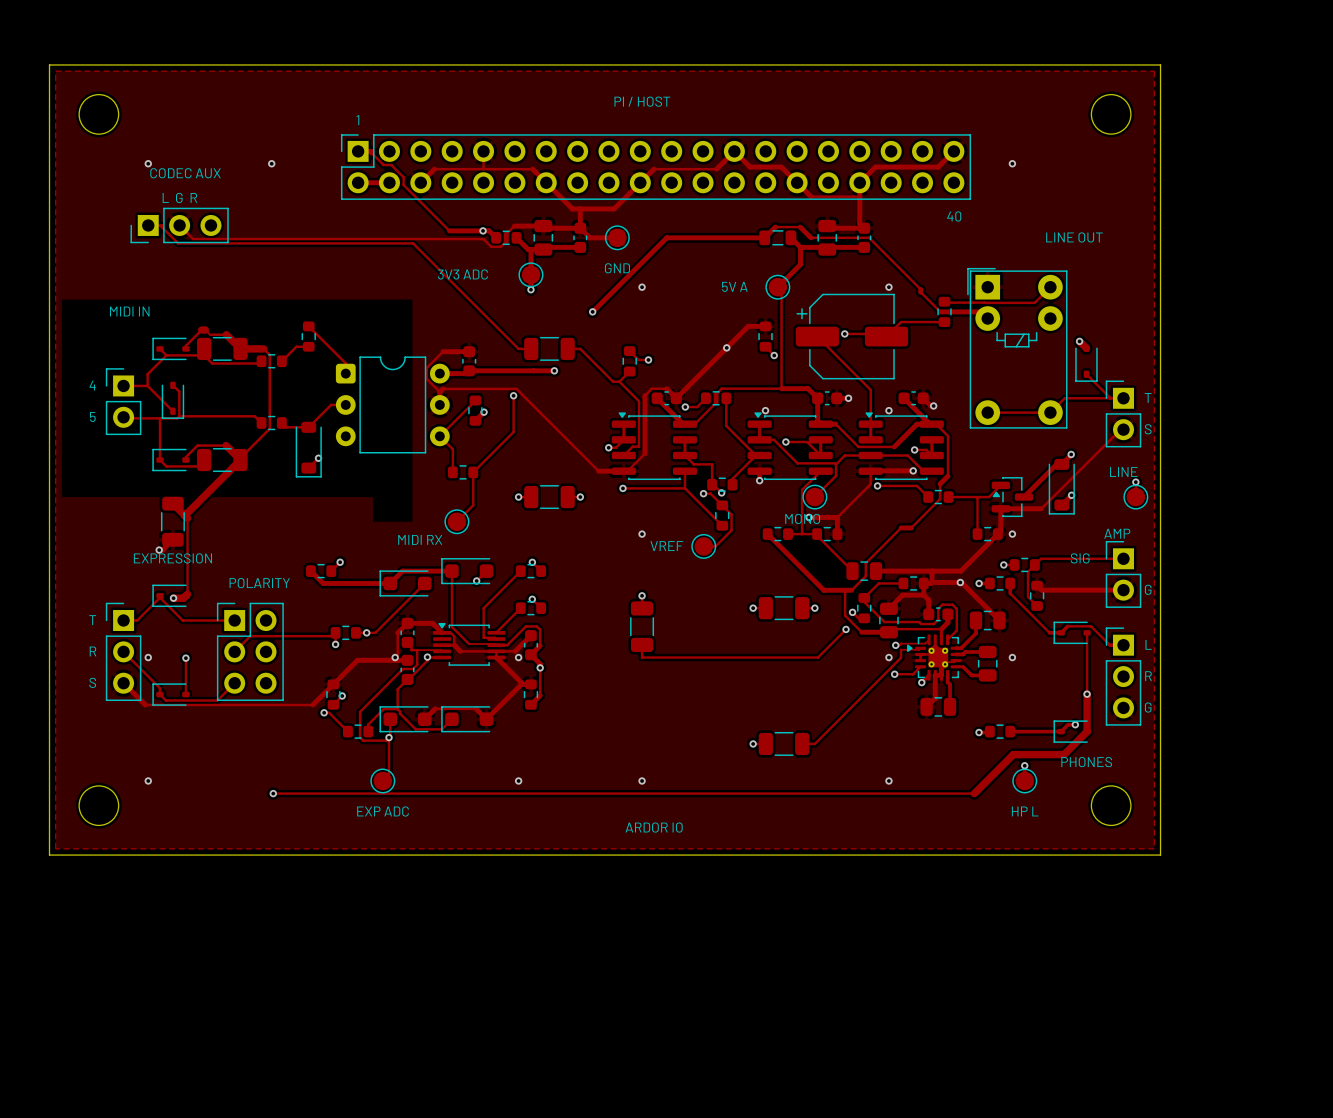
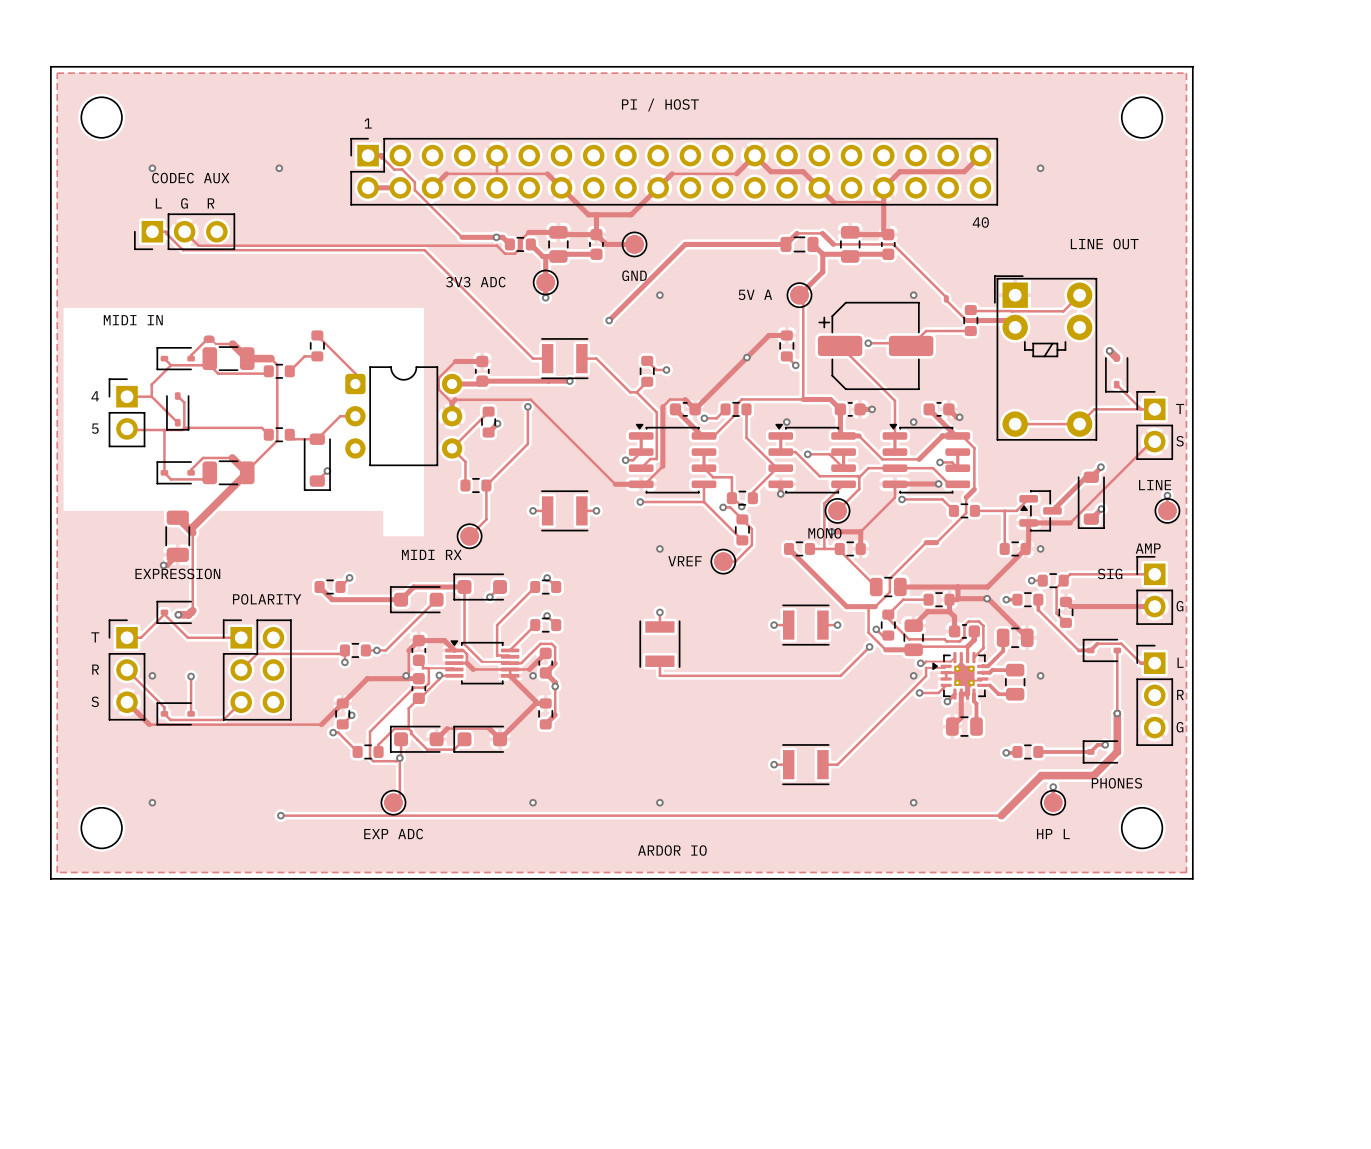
part footprint: [524, 336, 575, 361] -> [541, 338, 589, 380]
part footprint: [524, 485, 575, 510] -> [541, 490, 589, 532]
part footprint: [758, 596, 810, 621] -> [782, 604, 830, 646]
part footprint: [630, 601, 655, 652] -> [639, 620, 681, 668]
part footprint: [758, 731, 810, 756] -> [782, 744, 830, 786]

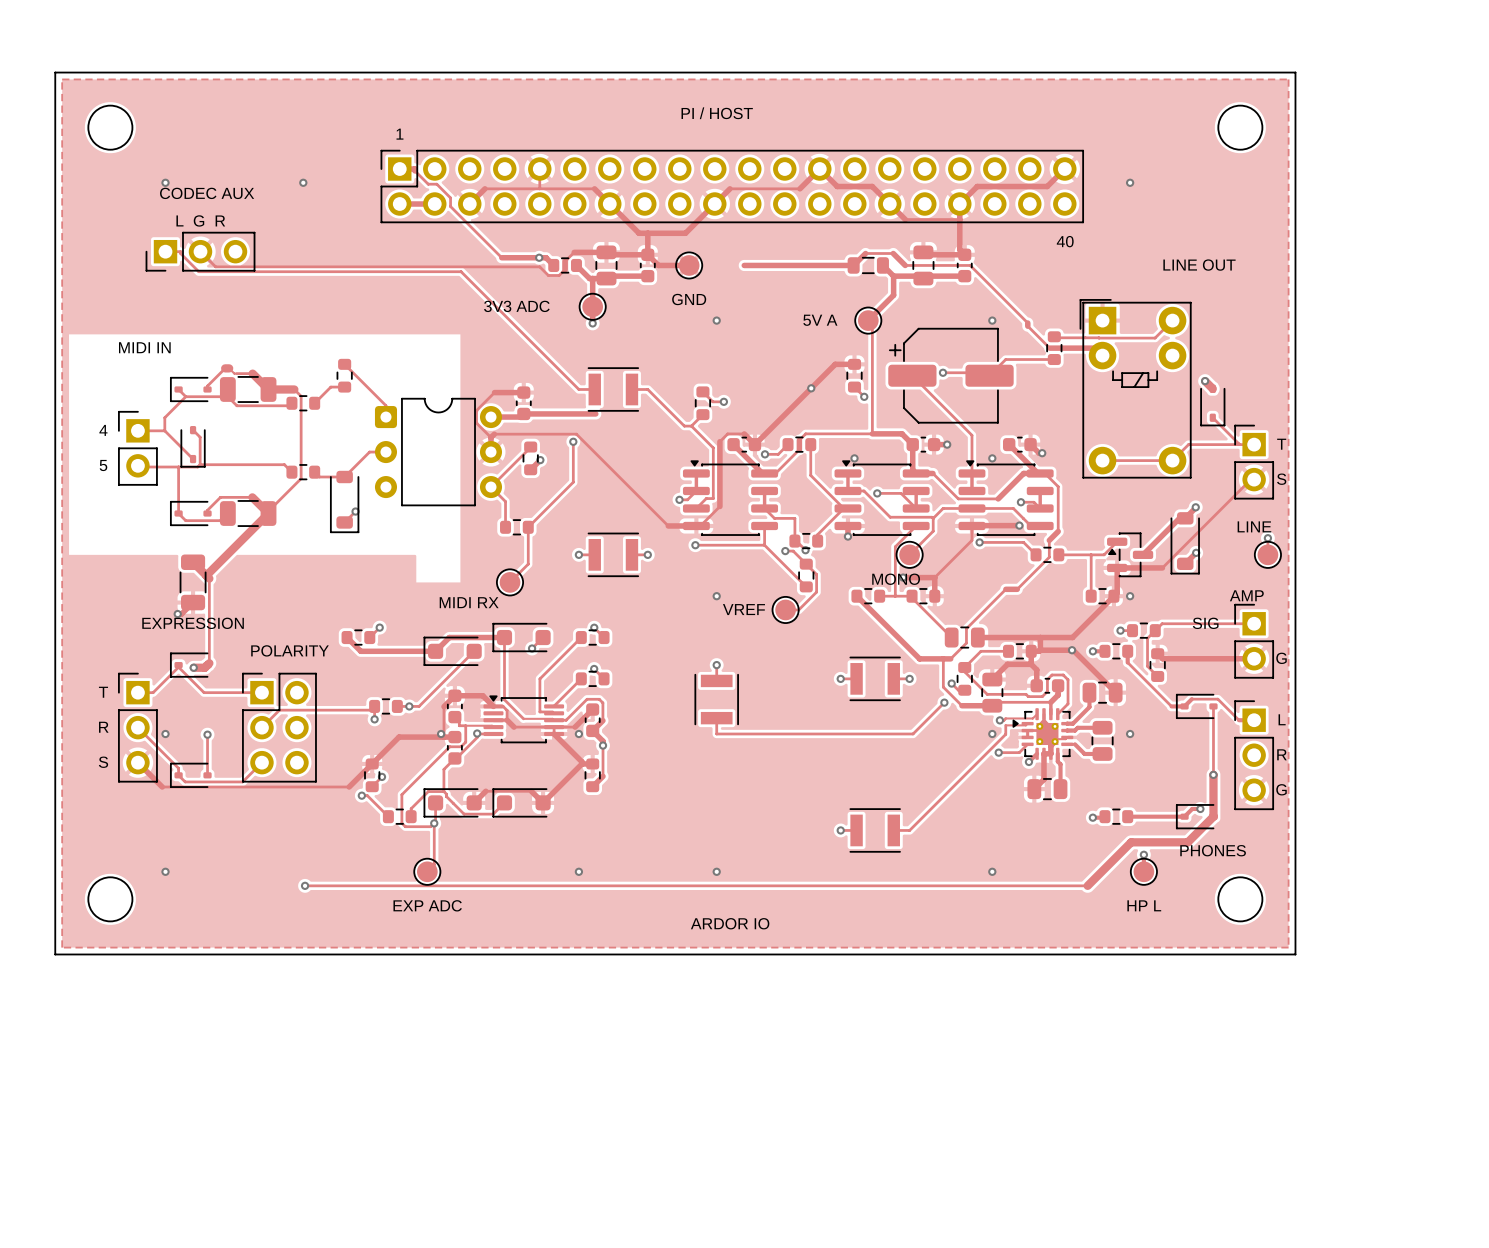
track: (685, 244) (609, 320) -> none
via: (609, 320) -> none
track: (548, 381) (569, 381) -> none
via: (569, 381) -> none

